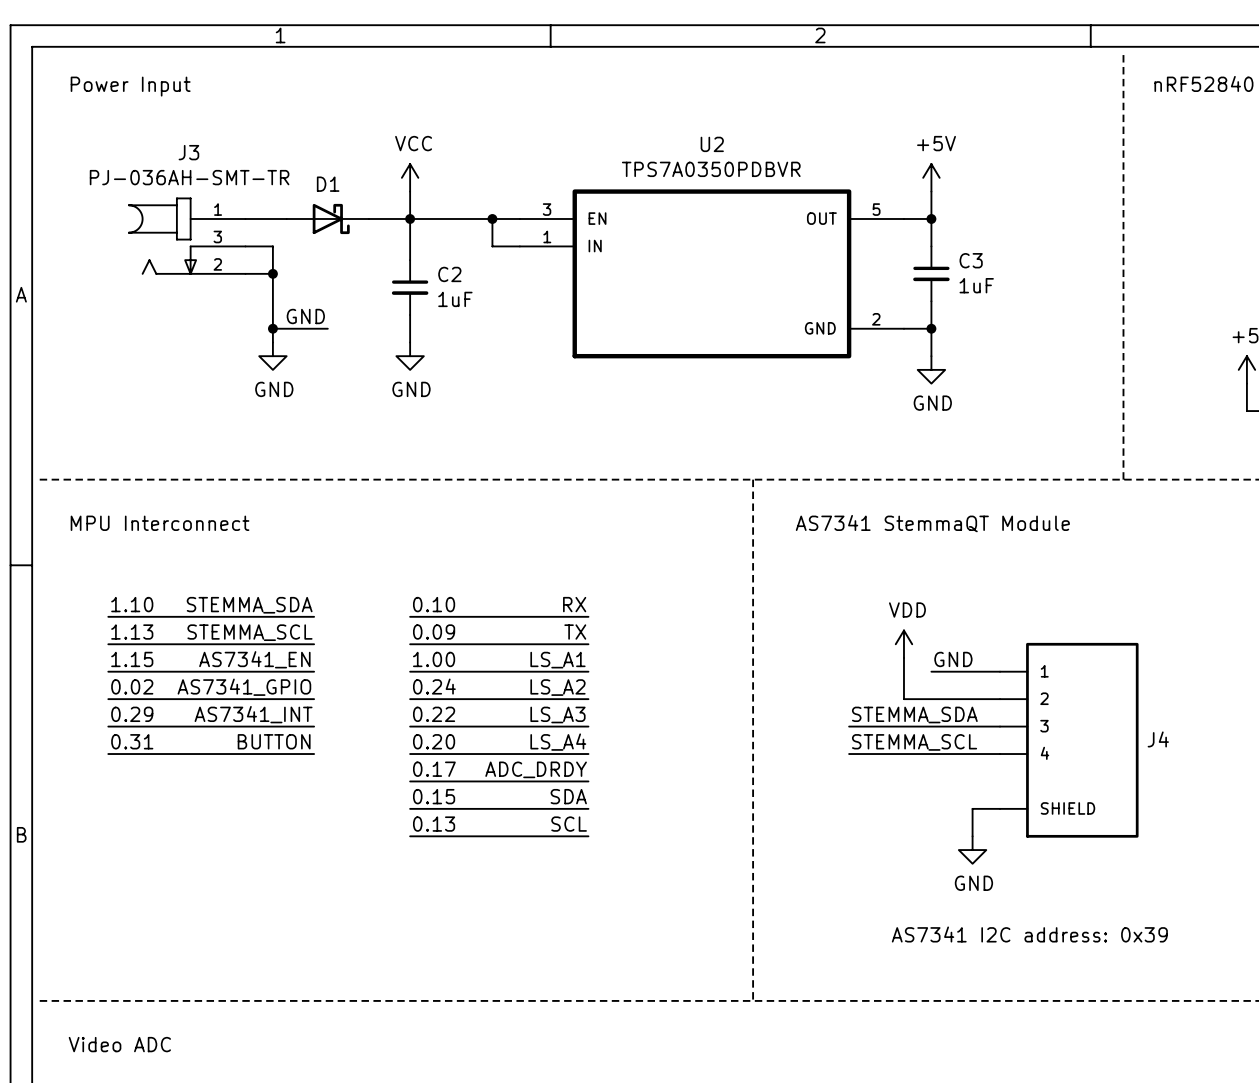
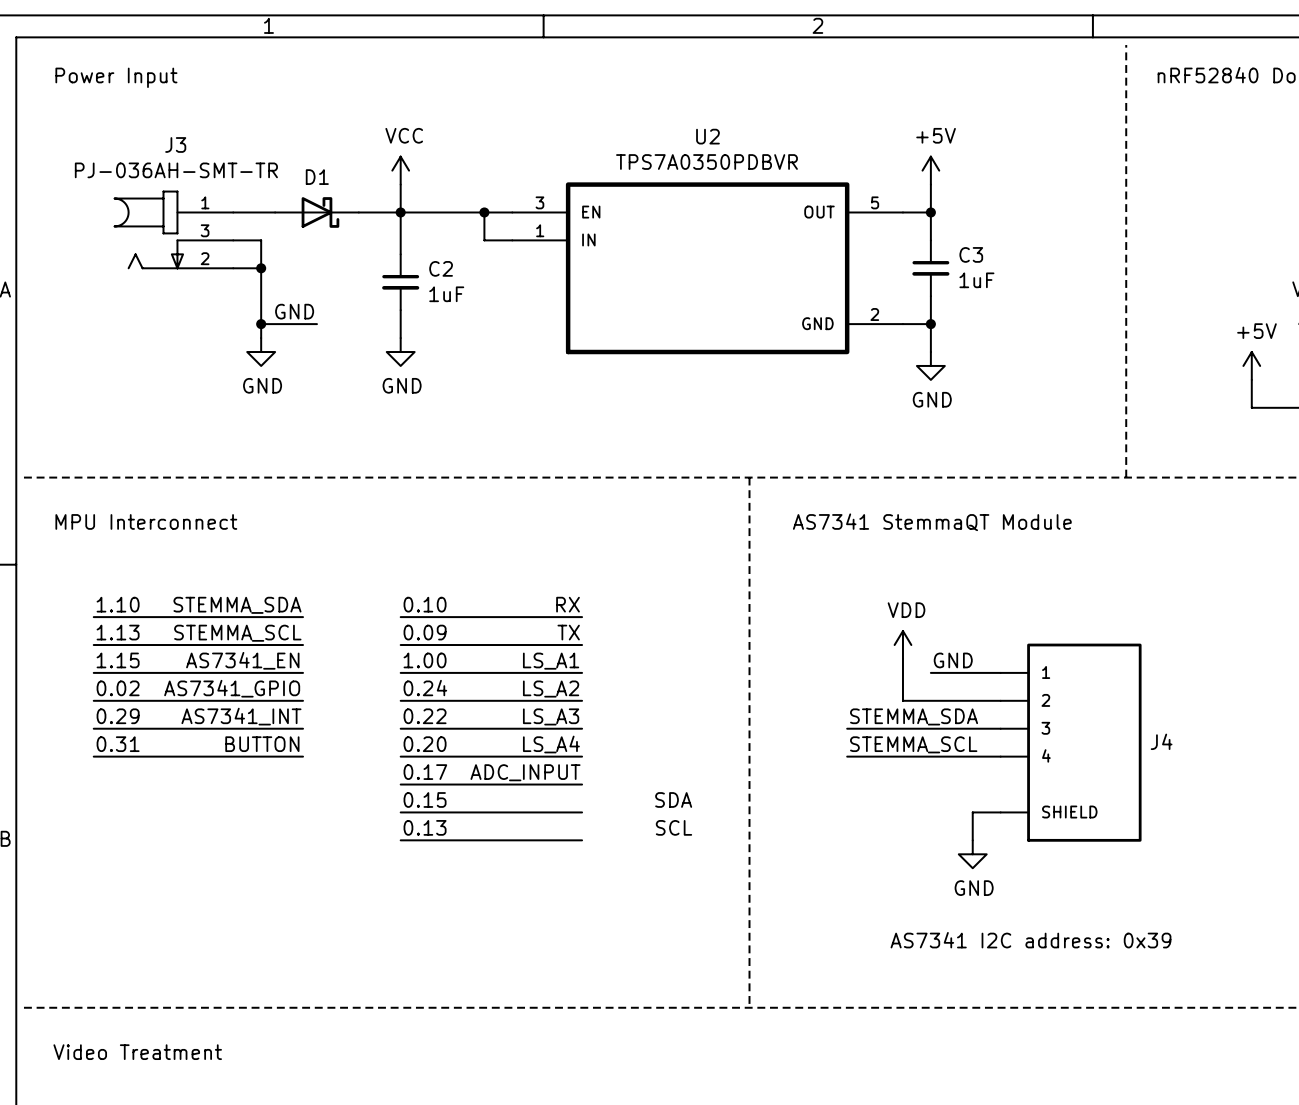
label: ADC_DRDY (536, 769) -> ADC_INPUT (525, 772)
label position: SDA (568, 796) -> SDA (673, 799)
label position: SCL (569, 824) -> SCL (673, 827)
text: Video ADC (119, 1044) -> Video Treatment (137, 1052)

